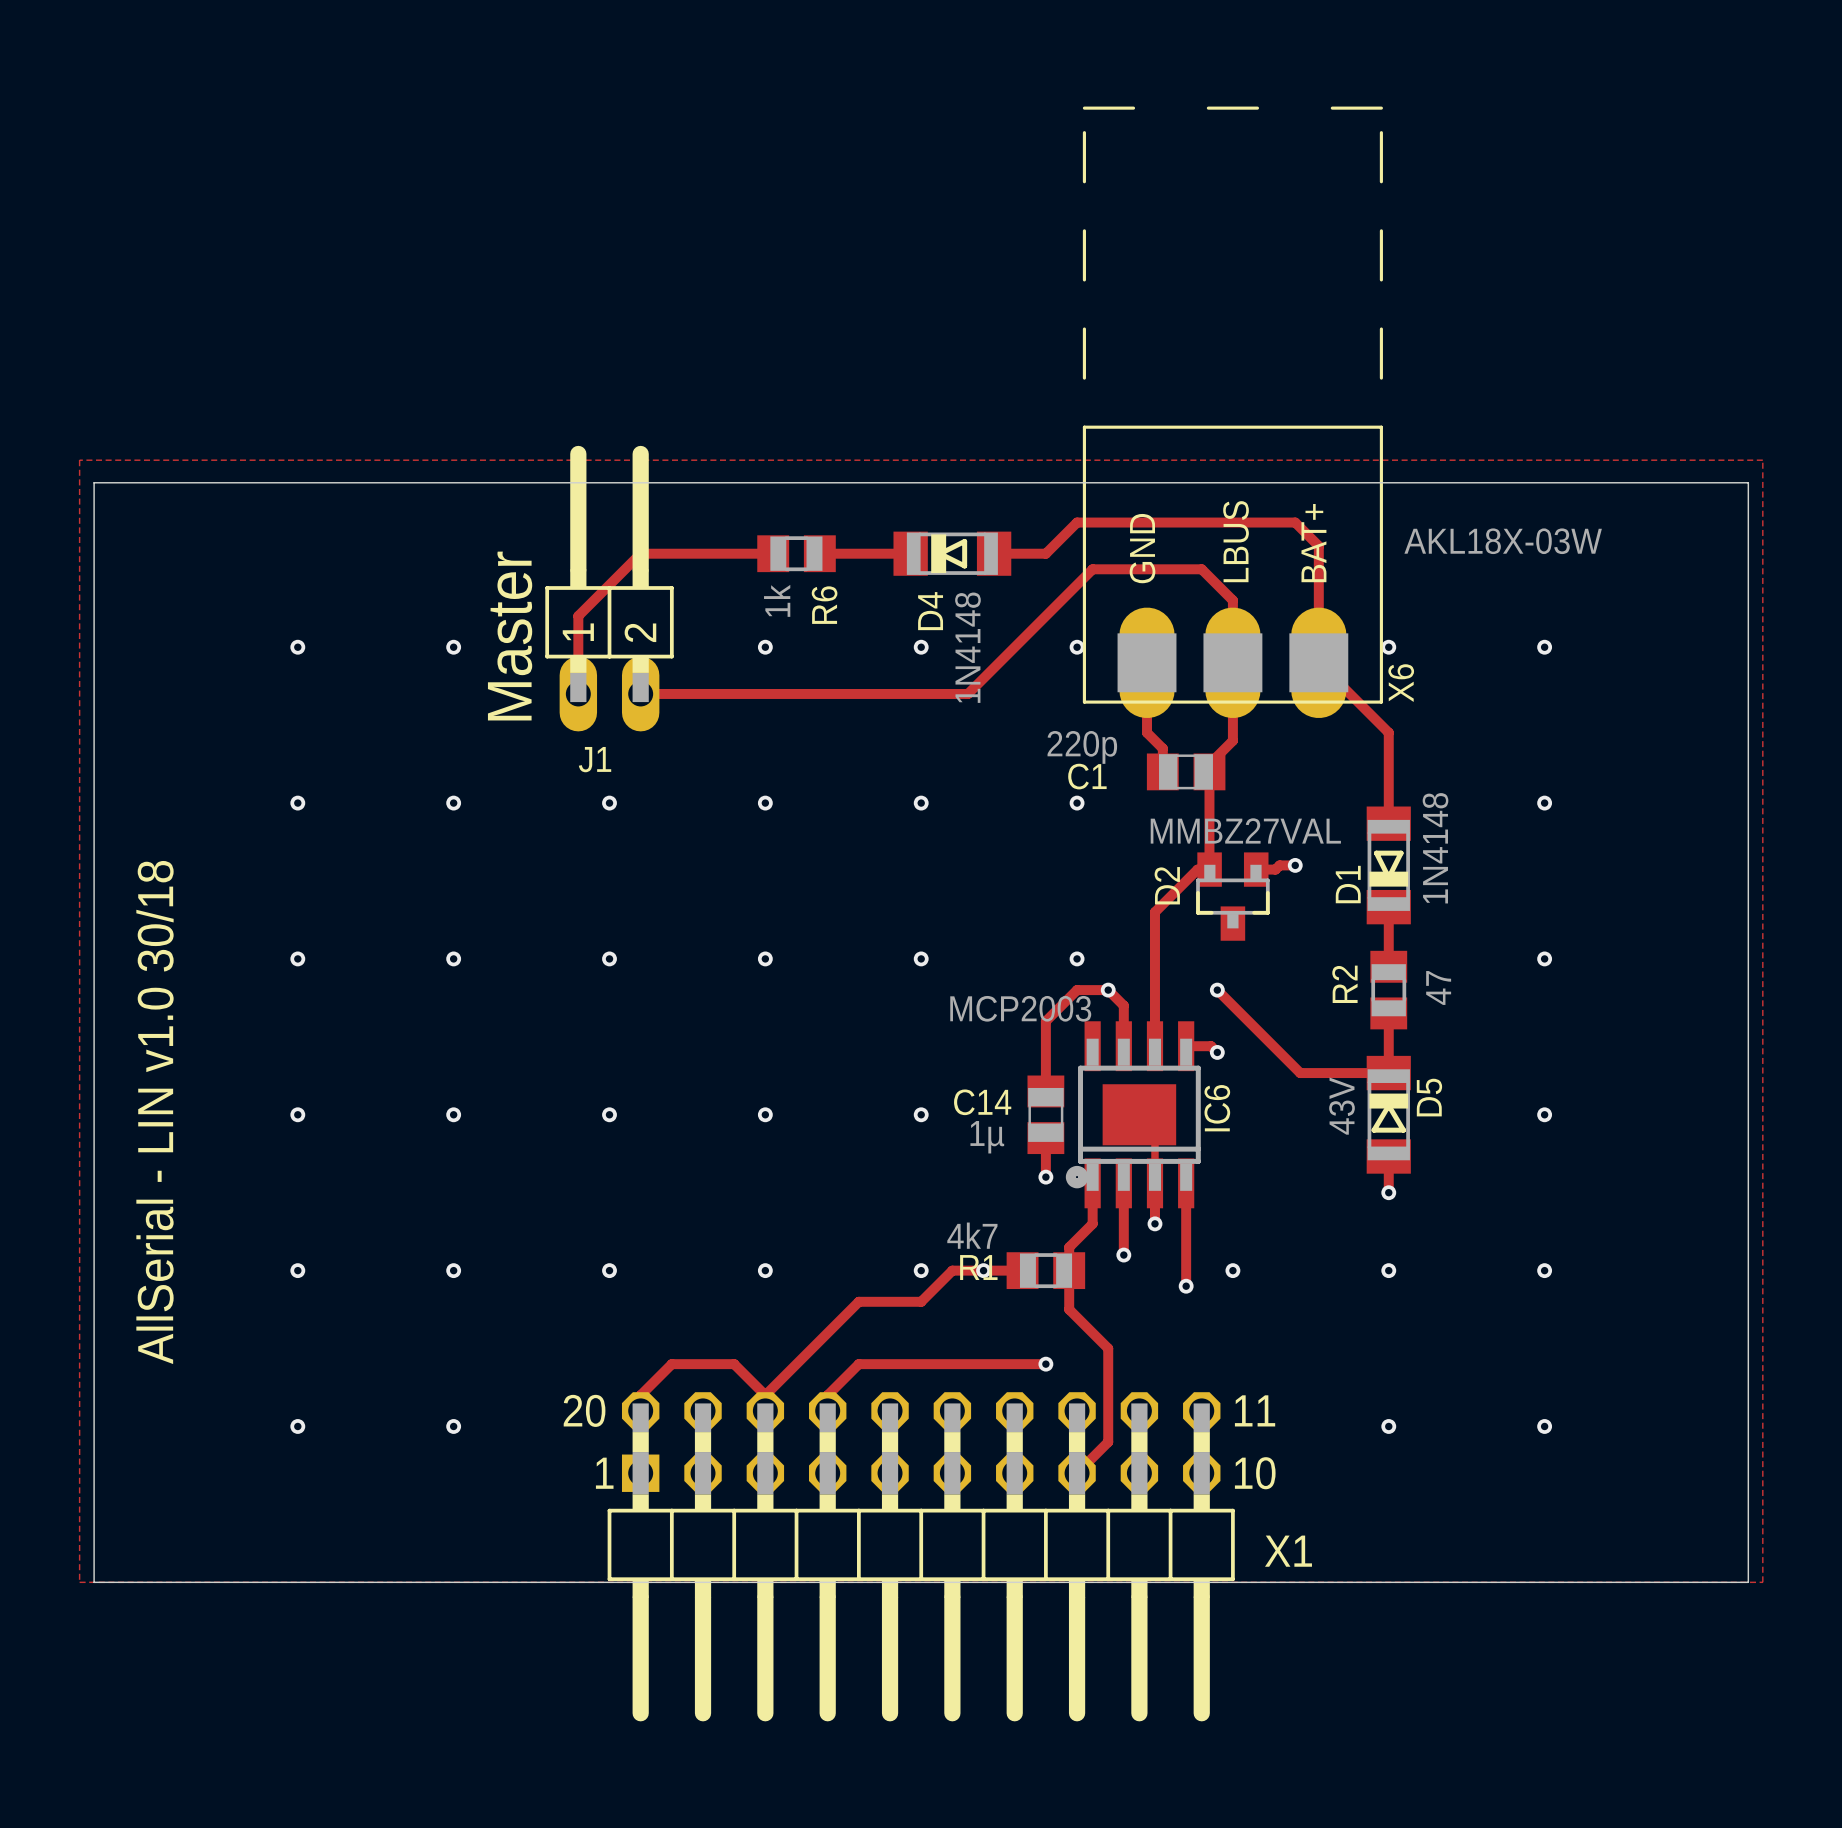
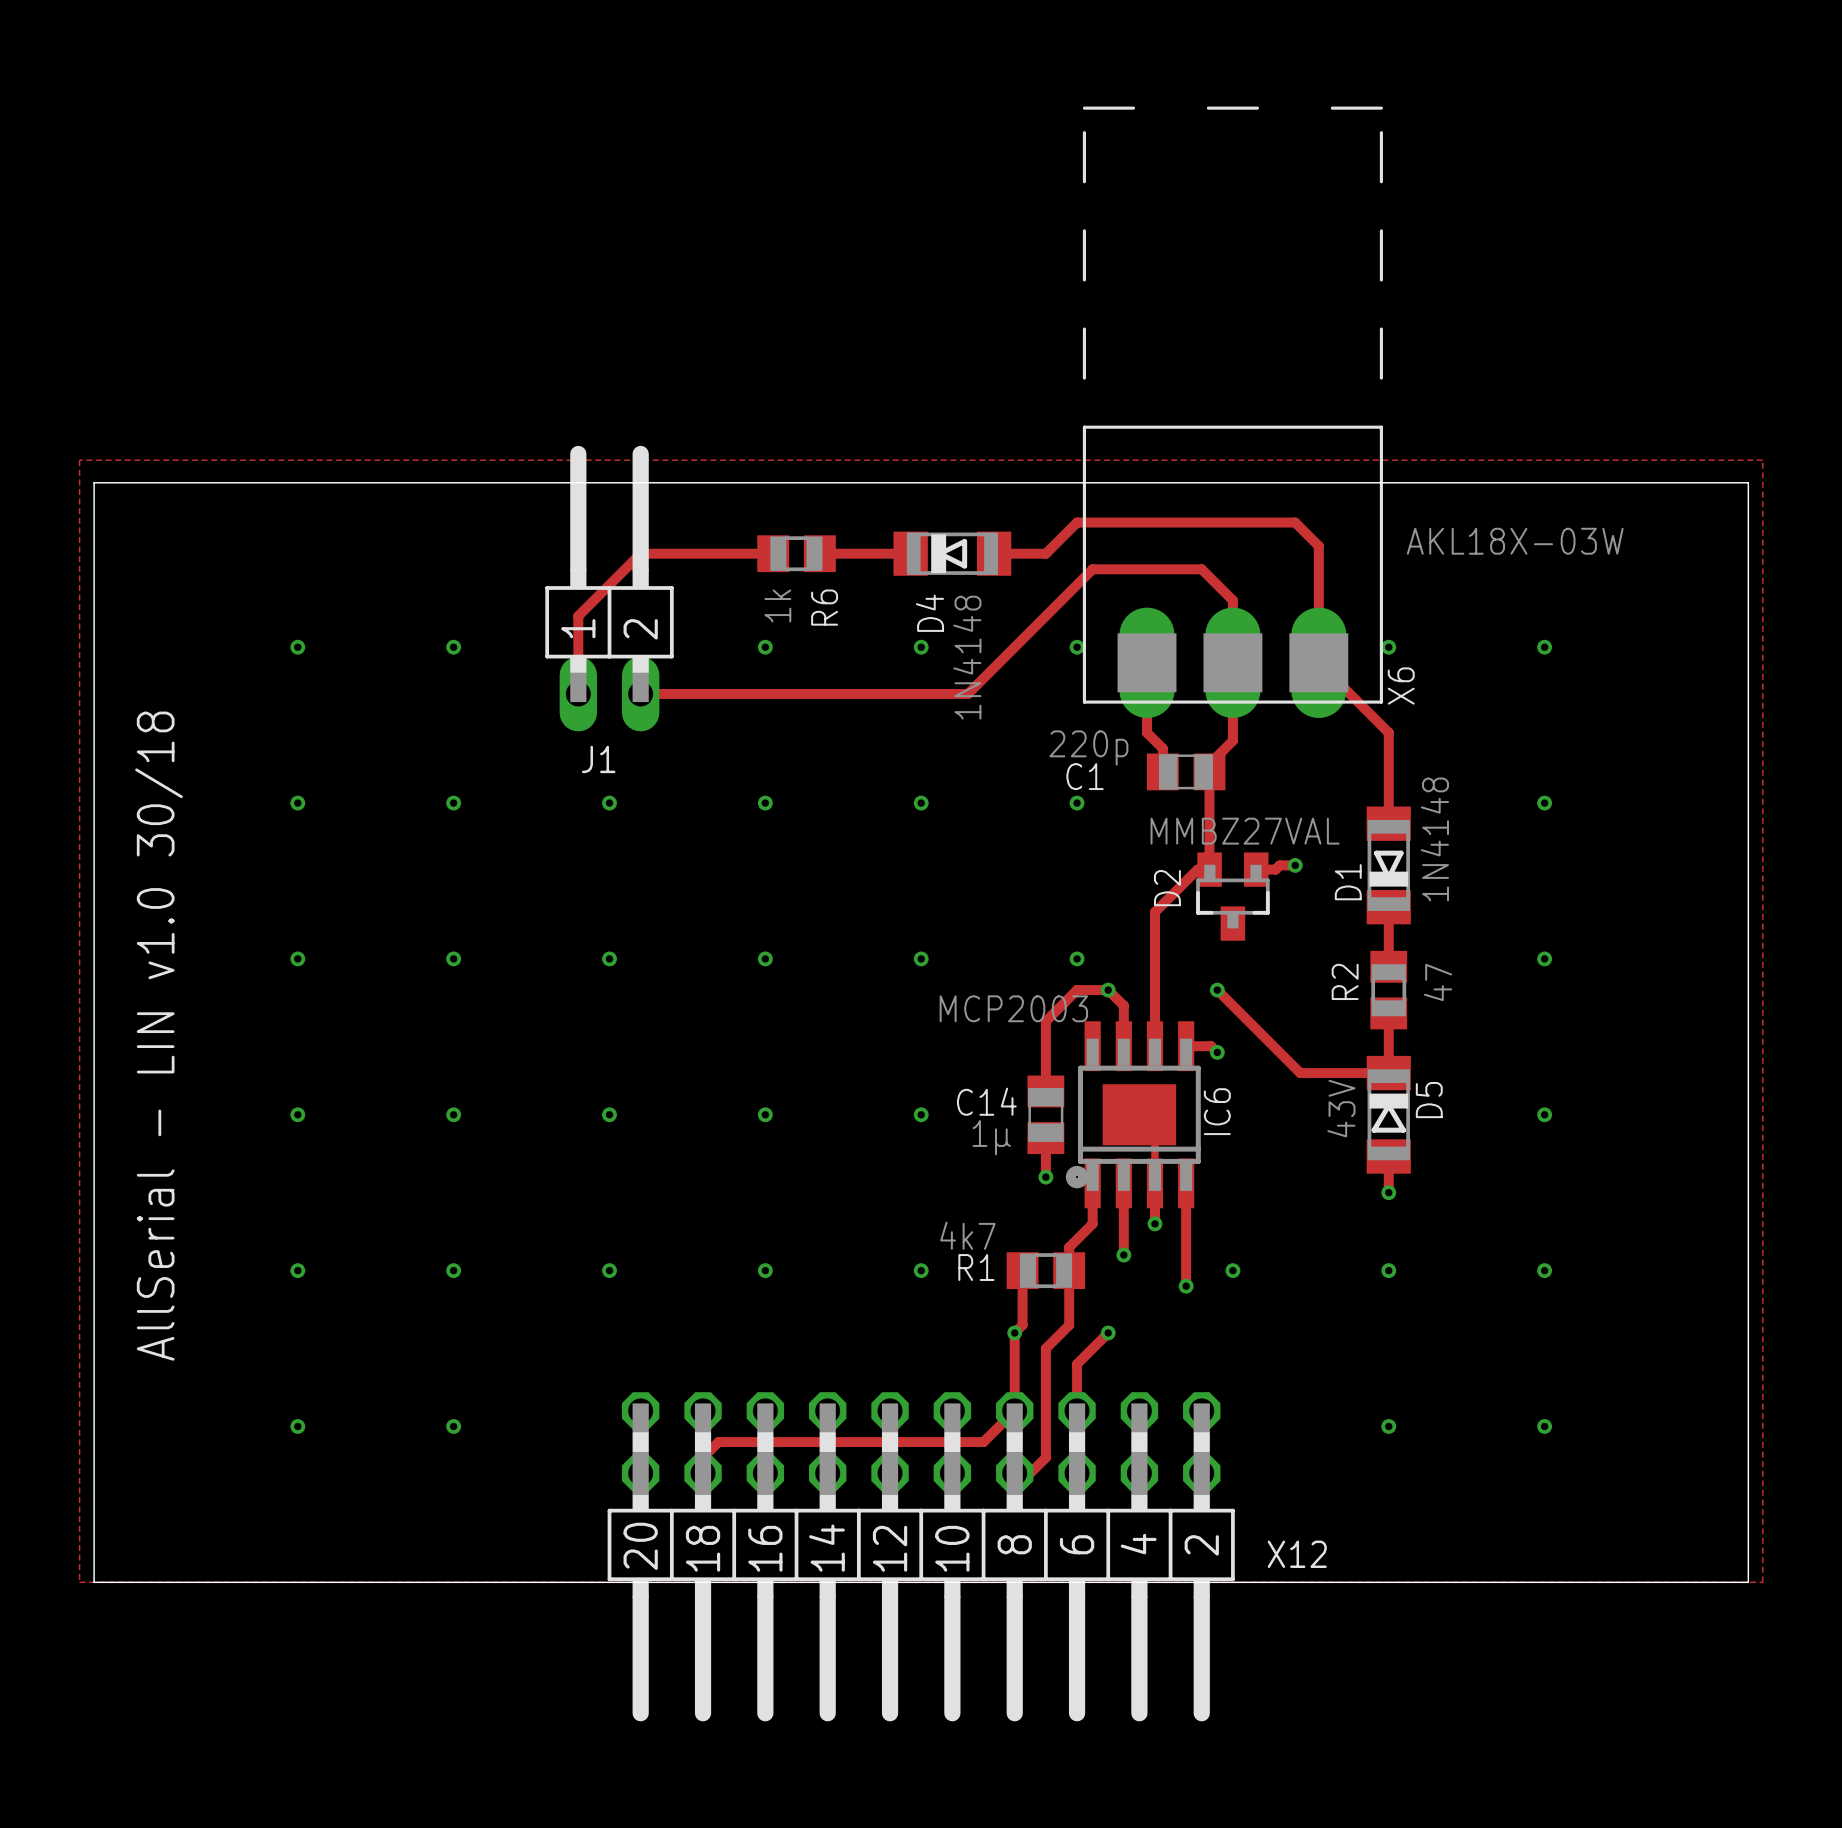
text: LBUS (1236, 541) -> none
text: BAT+ (1313, 543) -> none
text: GND (1142, 548) -> none
text: Master (510, 636) -> none
X1: (921, 1102) -> none
X12: none -> (921, 1102)
via: (983, 1270) -> none
track: (1022, 1270) (952, 1270) (921, 1301) (858, 1301) (765, 1395) -> (1022, 1270) (1022, 1325) (1014, 1332) (1014, 1410) (983, 1442) (718, 1442) (703, 1457) (703, 1473)
track: (1069, 1309) (1108, 1348) (1108, 1442) (1077, 1473) -> (1069, 1309) (1069, 1325) (1045, 1348) (1045, 1457) (1030, 1473) (1014, 1473)
via: none -> (1014, 1332)
track: none -> (1108, 1332) (1077, 1364) (1077, 1410)
via: none -> (1108, 1332)
track: (1045, 1364) (858, 1364) (827, 1395) (827, 1410) -> none
via: (1045, 1364) -> none
track: (765, 1395) (734, 1364) (671, 1364) (640, 1395) (640, 1410) -> none

